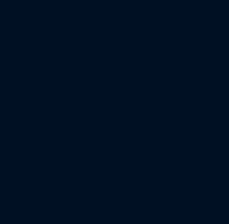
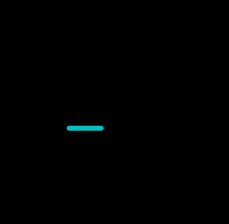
line: none -> (69, 128) (101, 128)

